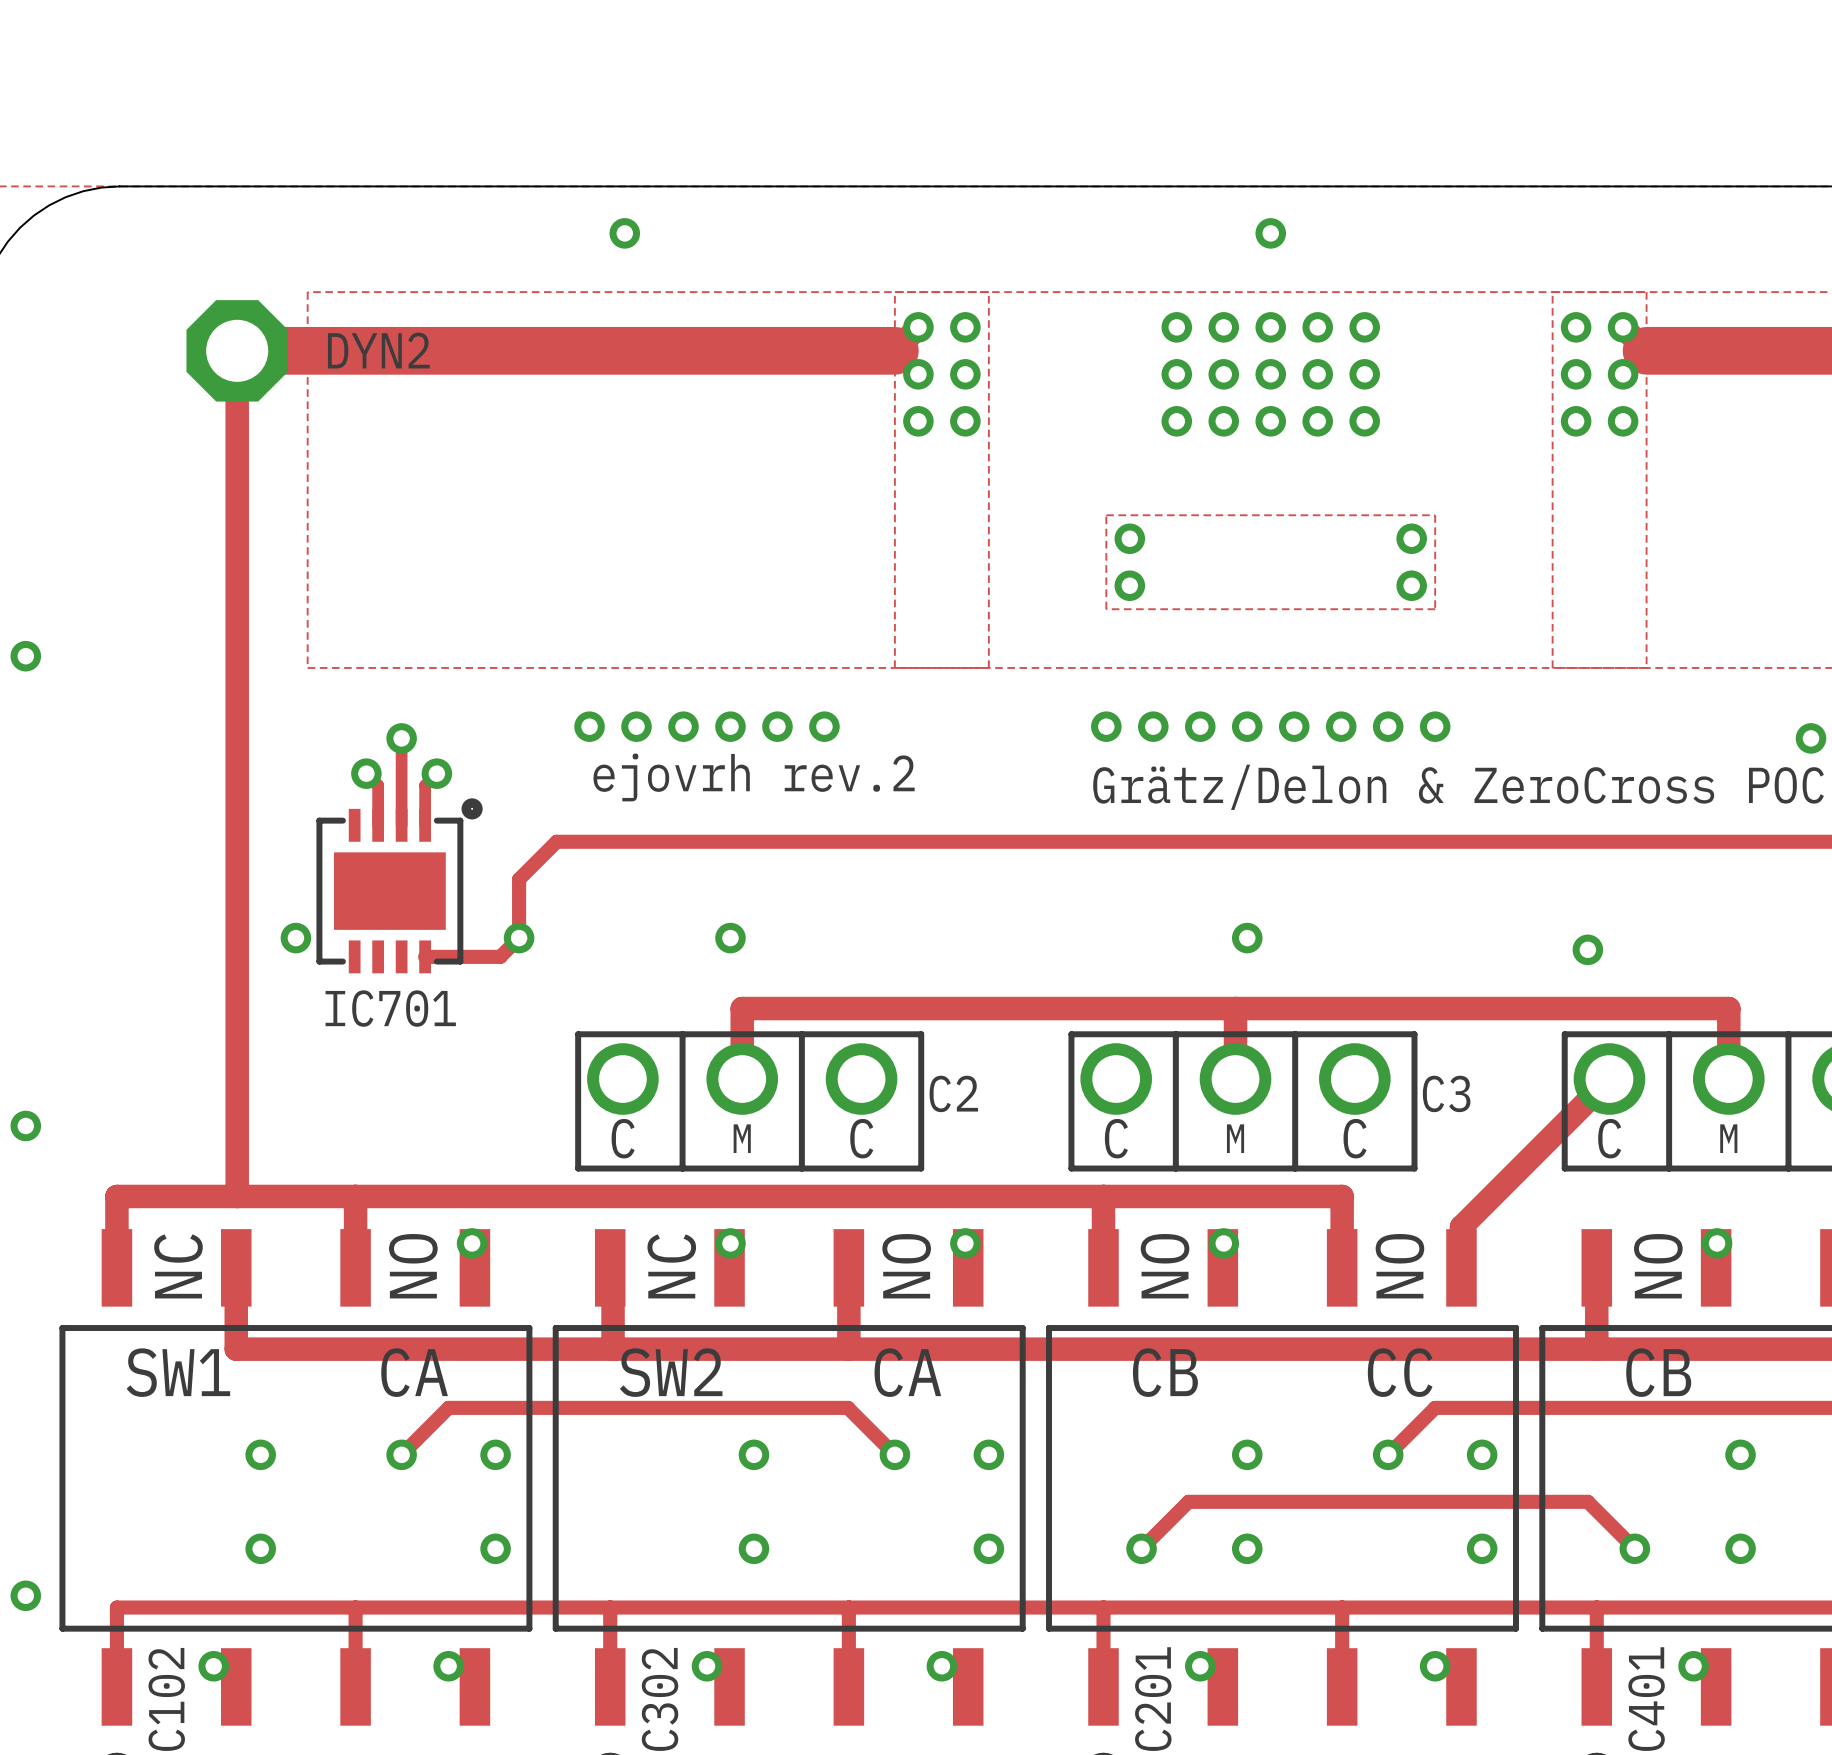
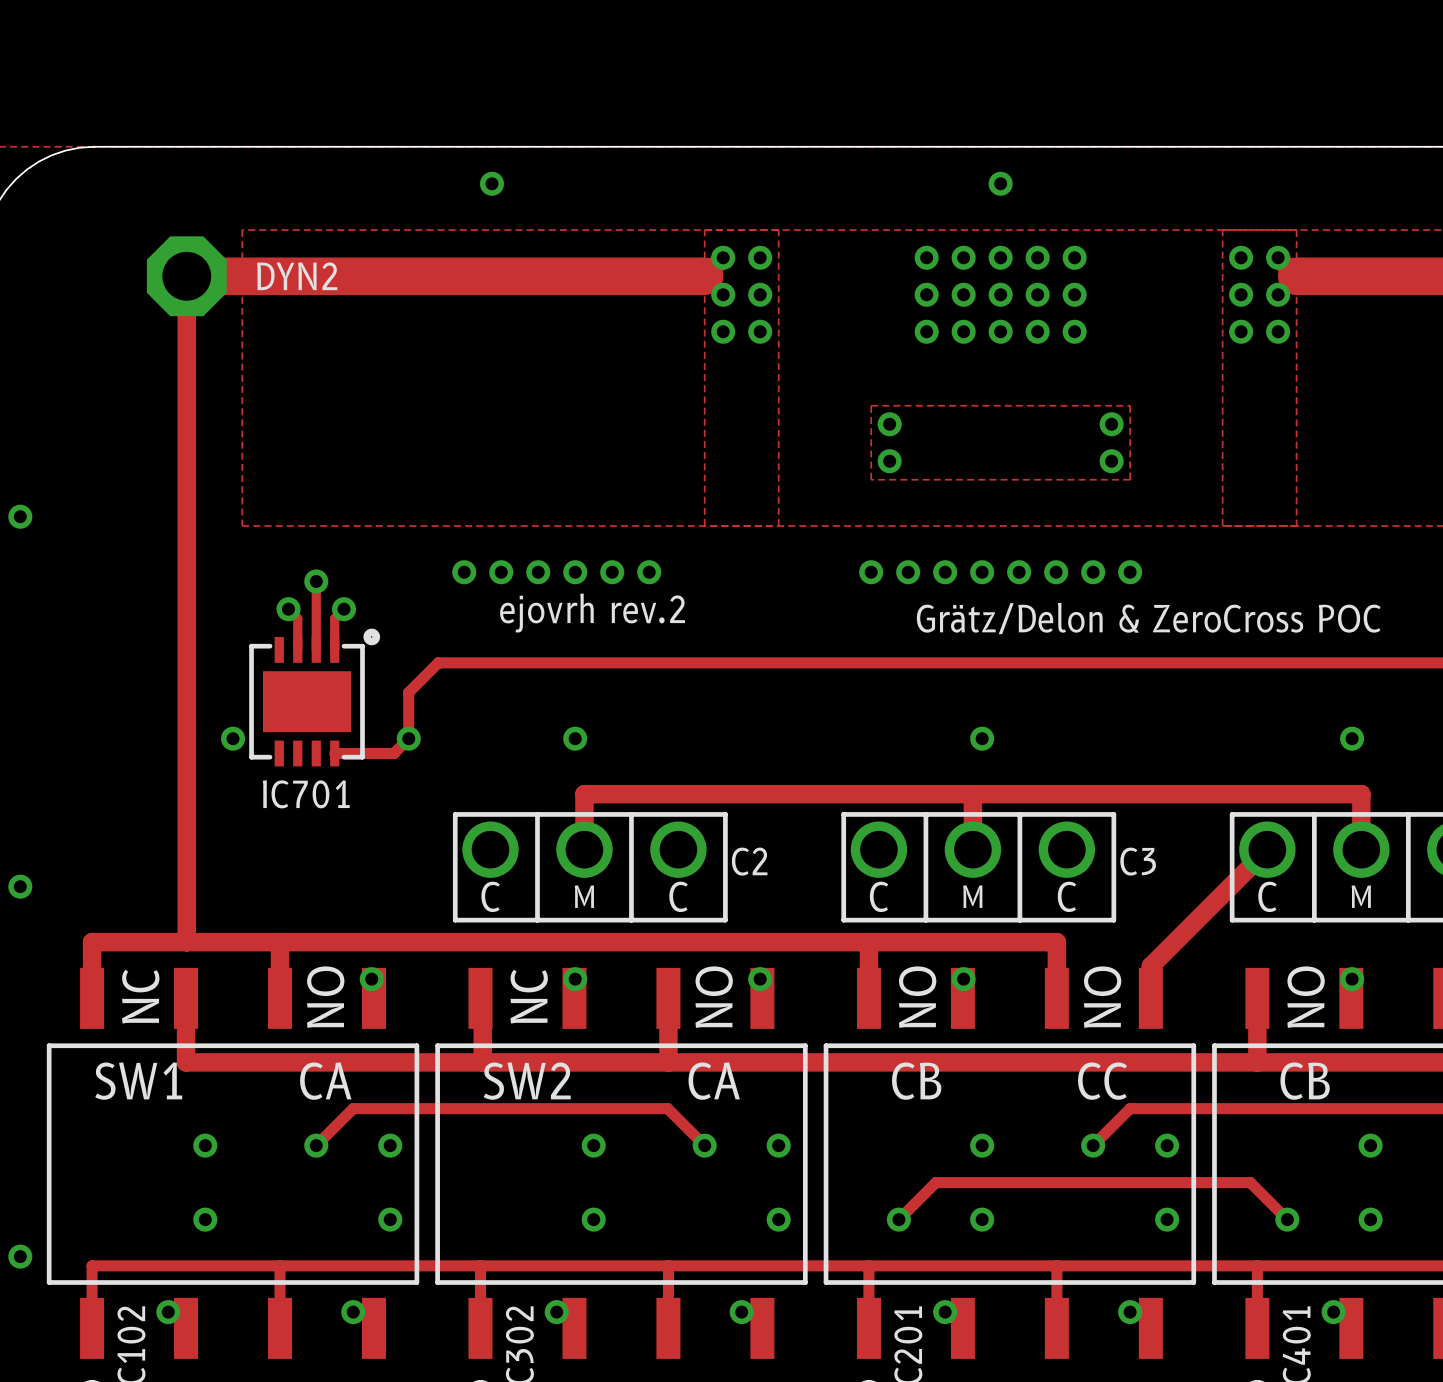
via: (1811, 738) -> none
via: none -> (1352, 738)
via: (1587, 949) -> none

